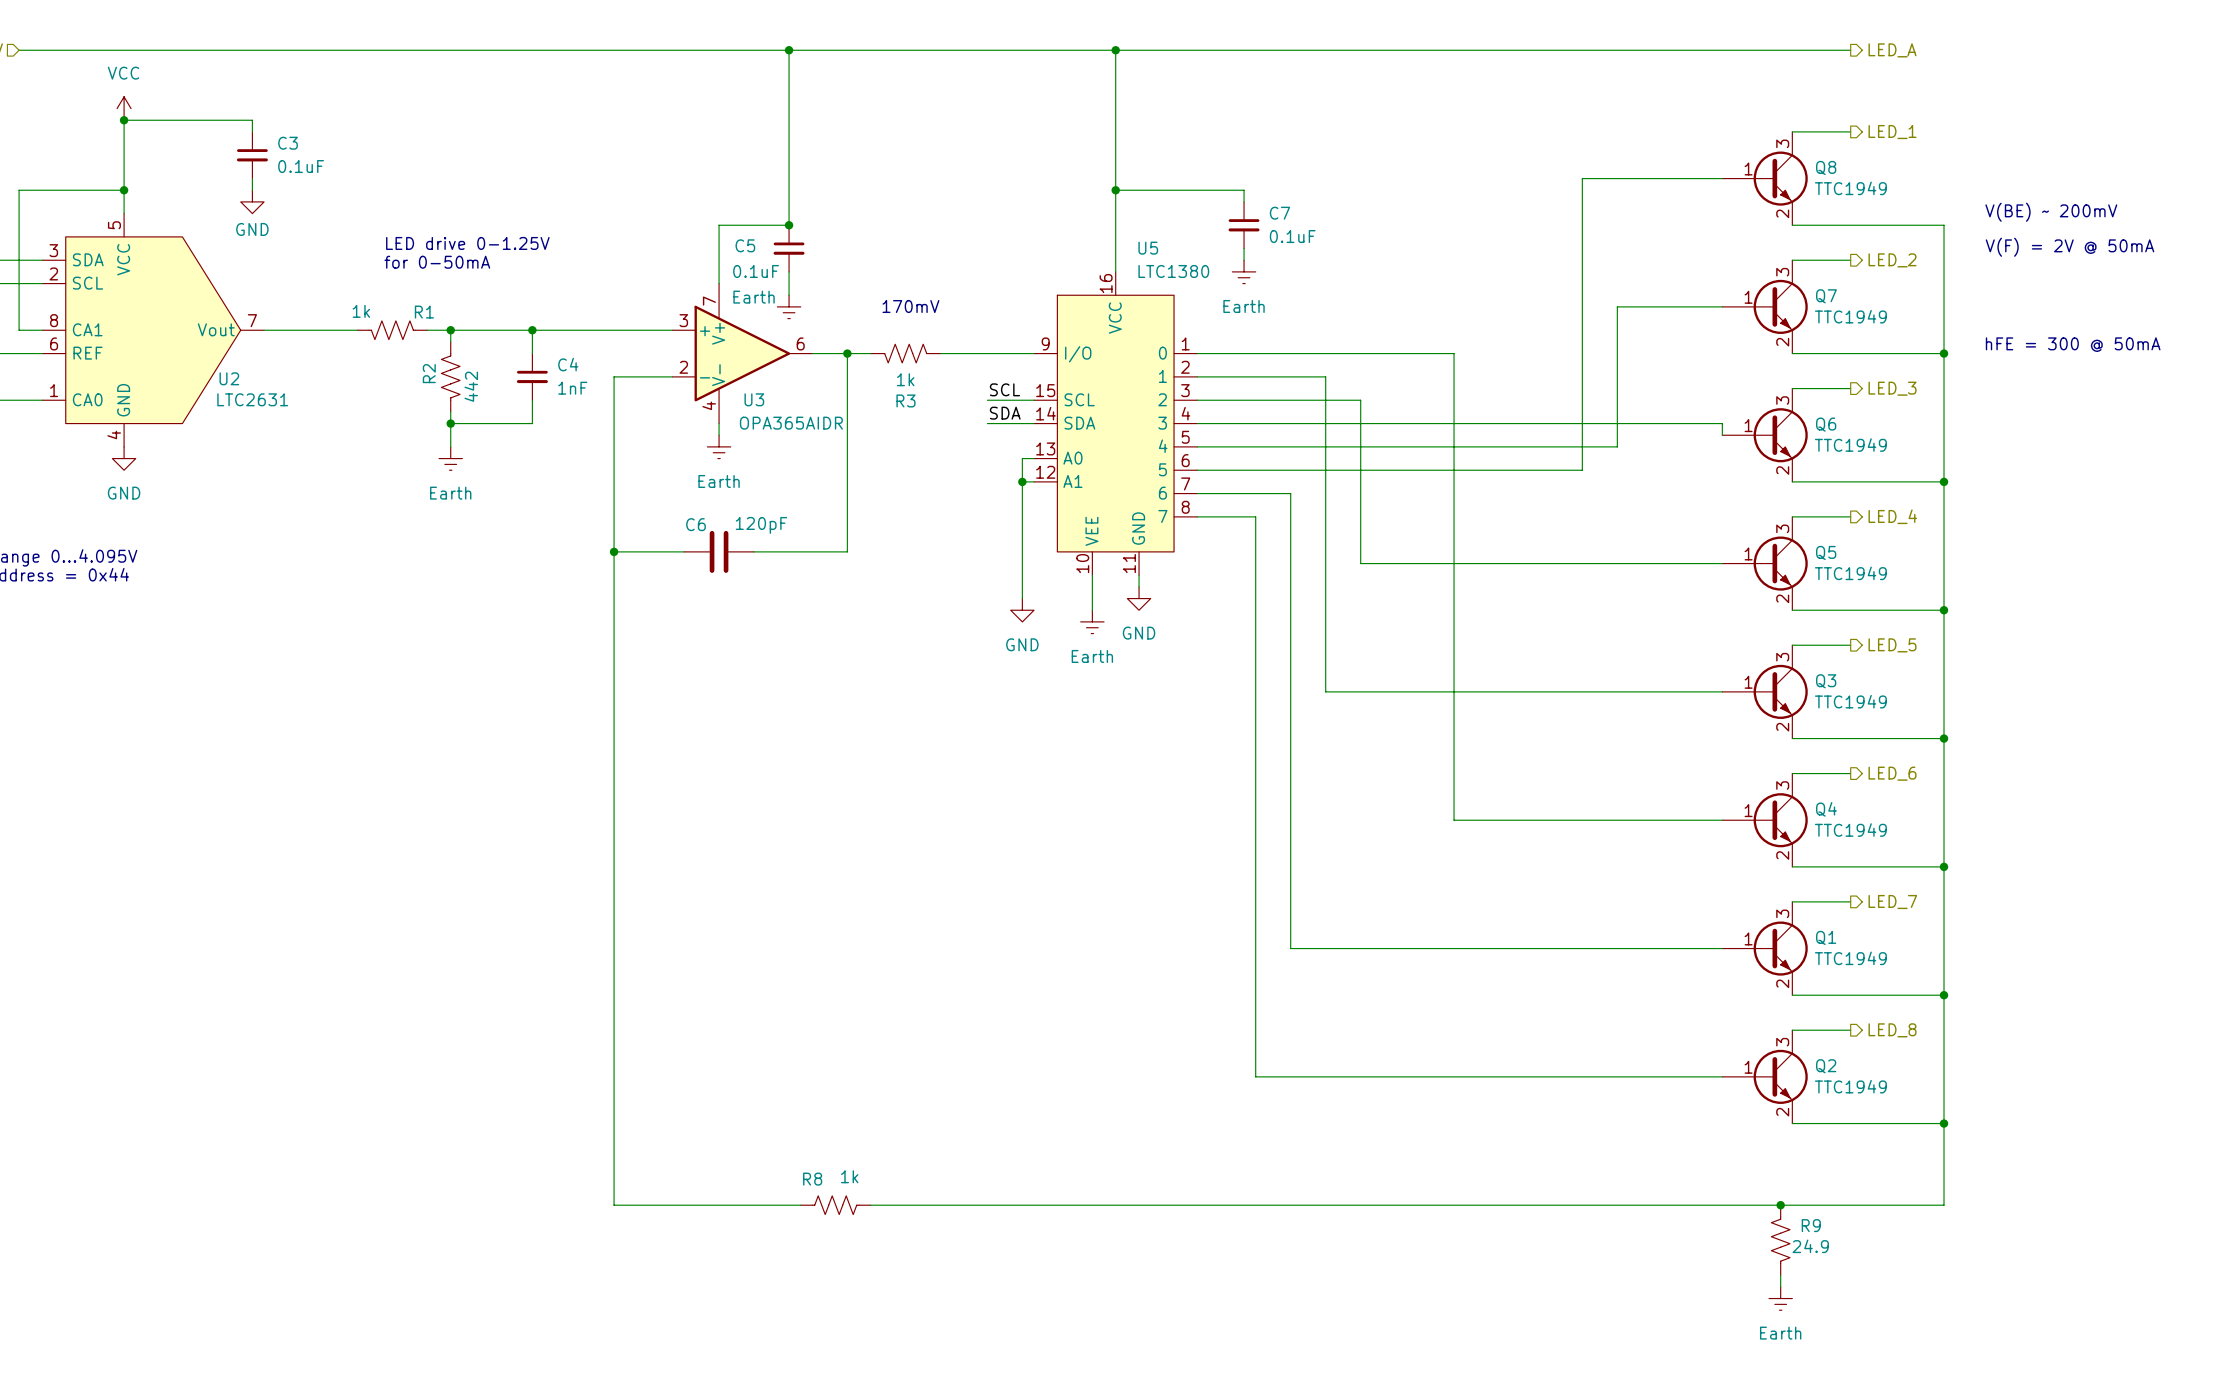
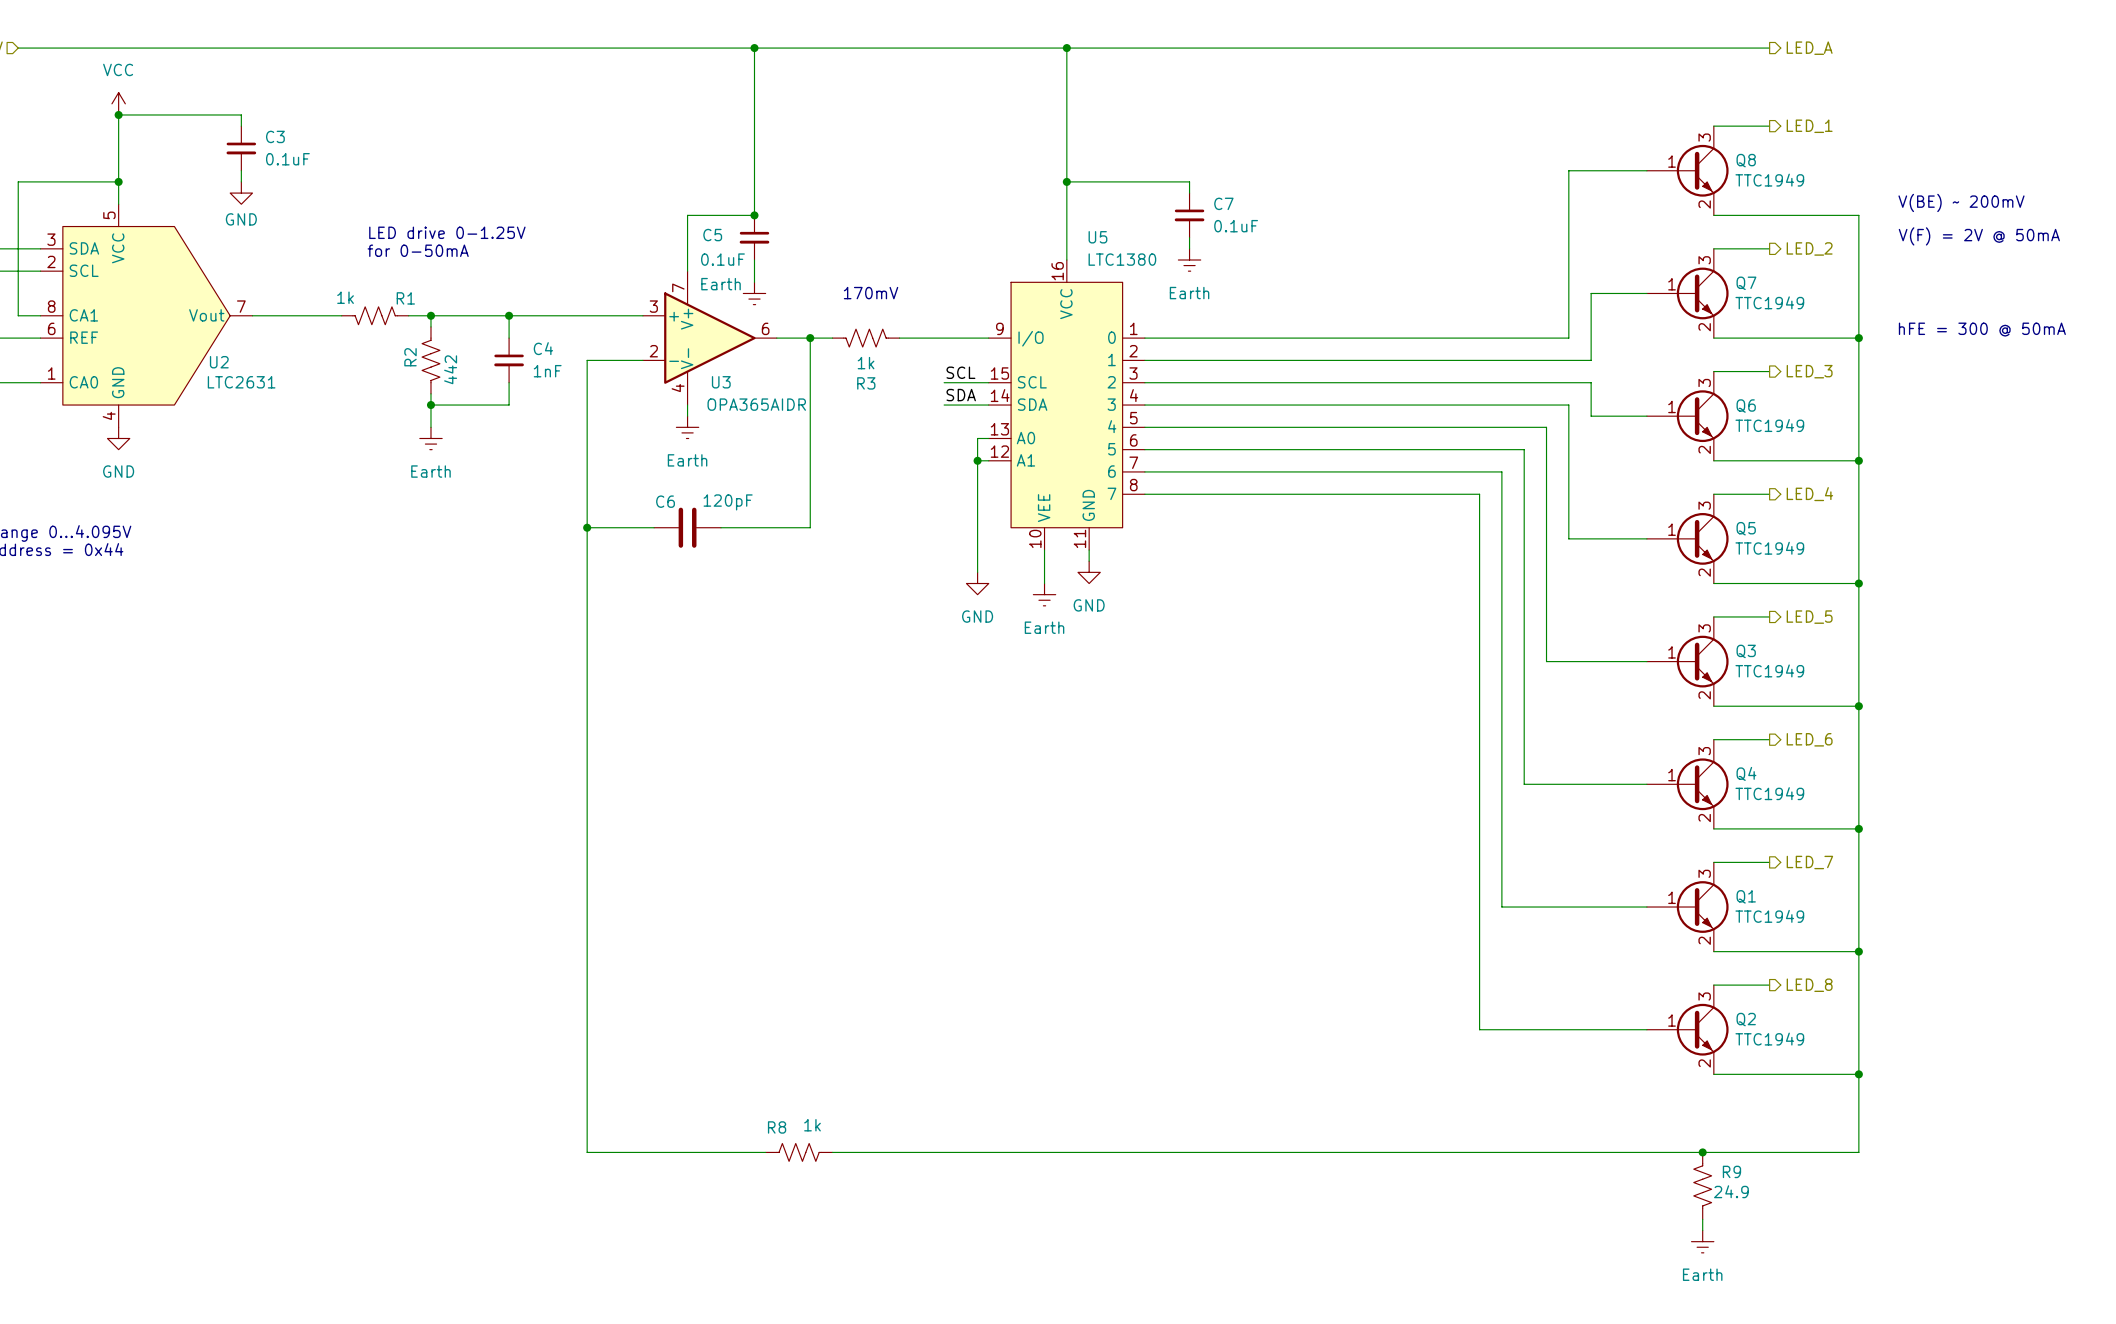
wire: (1640, 178) (1582, 178) (1582, 470) -> (1568, 170) (1568, 338) (1390, 338)
wire: (1664, 306) (1617, 306) (1617, 446) -> (1591, 293) (1591, 360) (1267, 360)
wire: (1454, 353) (1454, 820) (1594, 820) -> (1513, 449) (1524, 449) (1524, 784)
wire: (1325, 376) (1325, 691) (1617, 691) -> (1546, 427) (1546, 661)
wire: (1360, 400) (1360, 563) (1640, 563) -> (1301, 382) (1591, 382) (1591, 416) (1646, 416)
wire: (1640, 423) (1722, 423) (1722, 435) -> (1568, 405) (1568, 538)
wire: (1290, 493) (1290, 948) (1570, 948) -> (1234, 471) (1501, 471) (1501, 907)
wire: (1255, 516) (1255, 1076) (1547, 1076) -> (1200, 494) (1479, 494) (1479, 1029)

